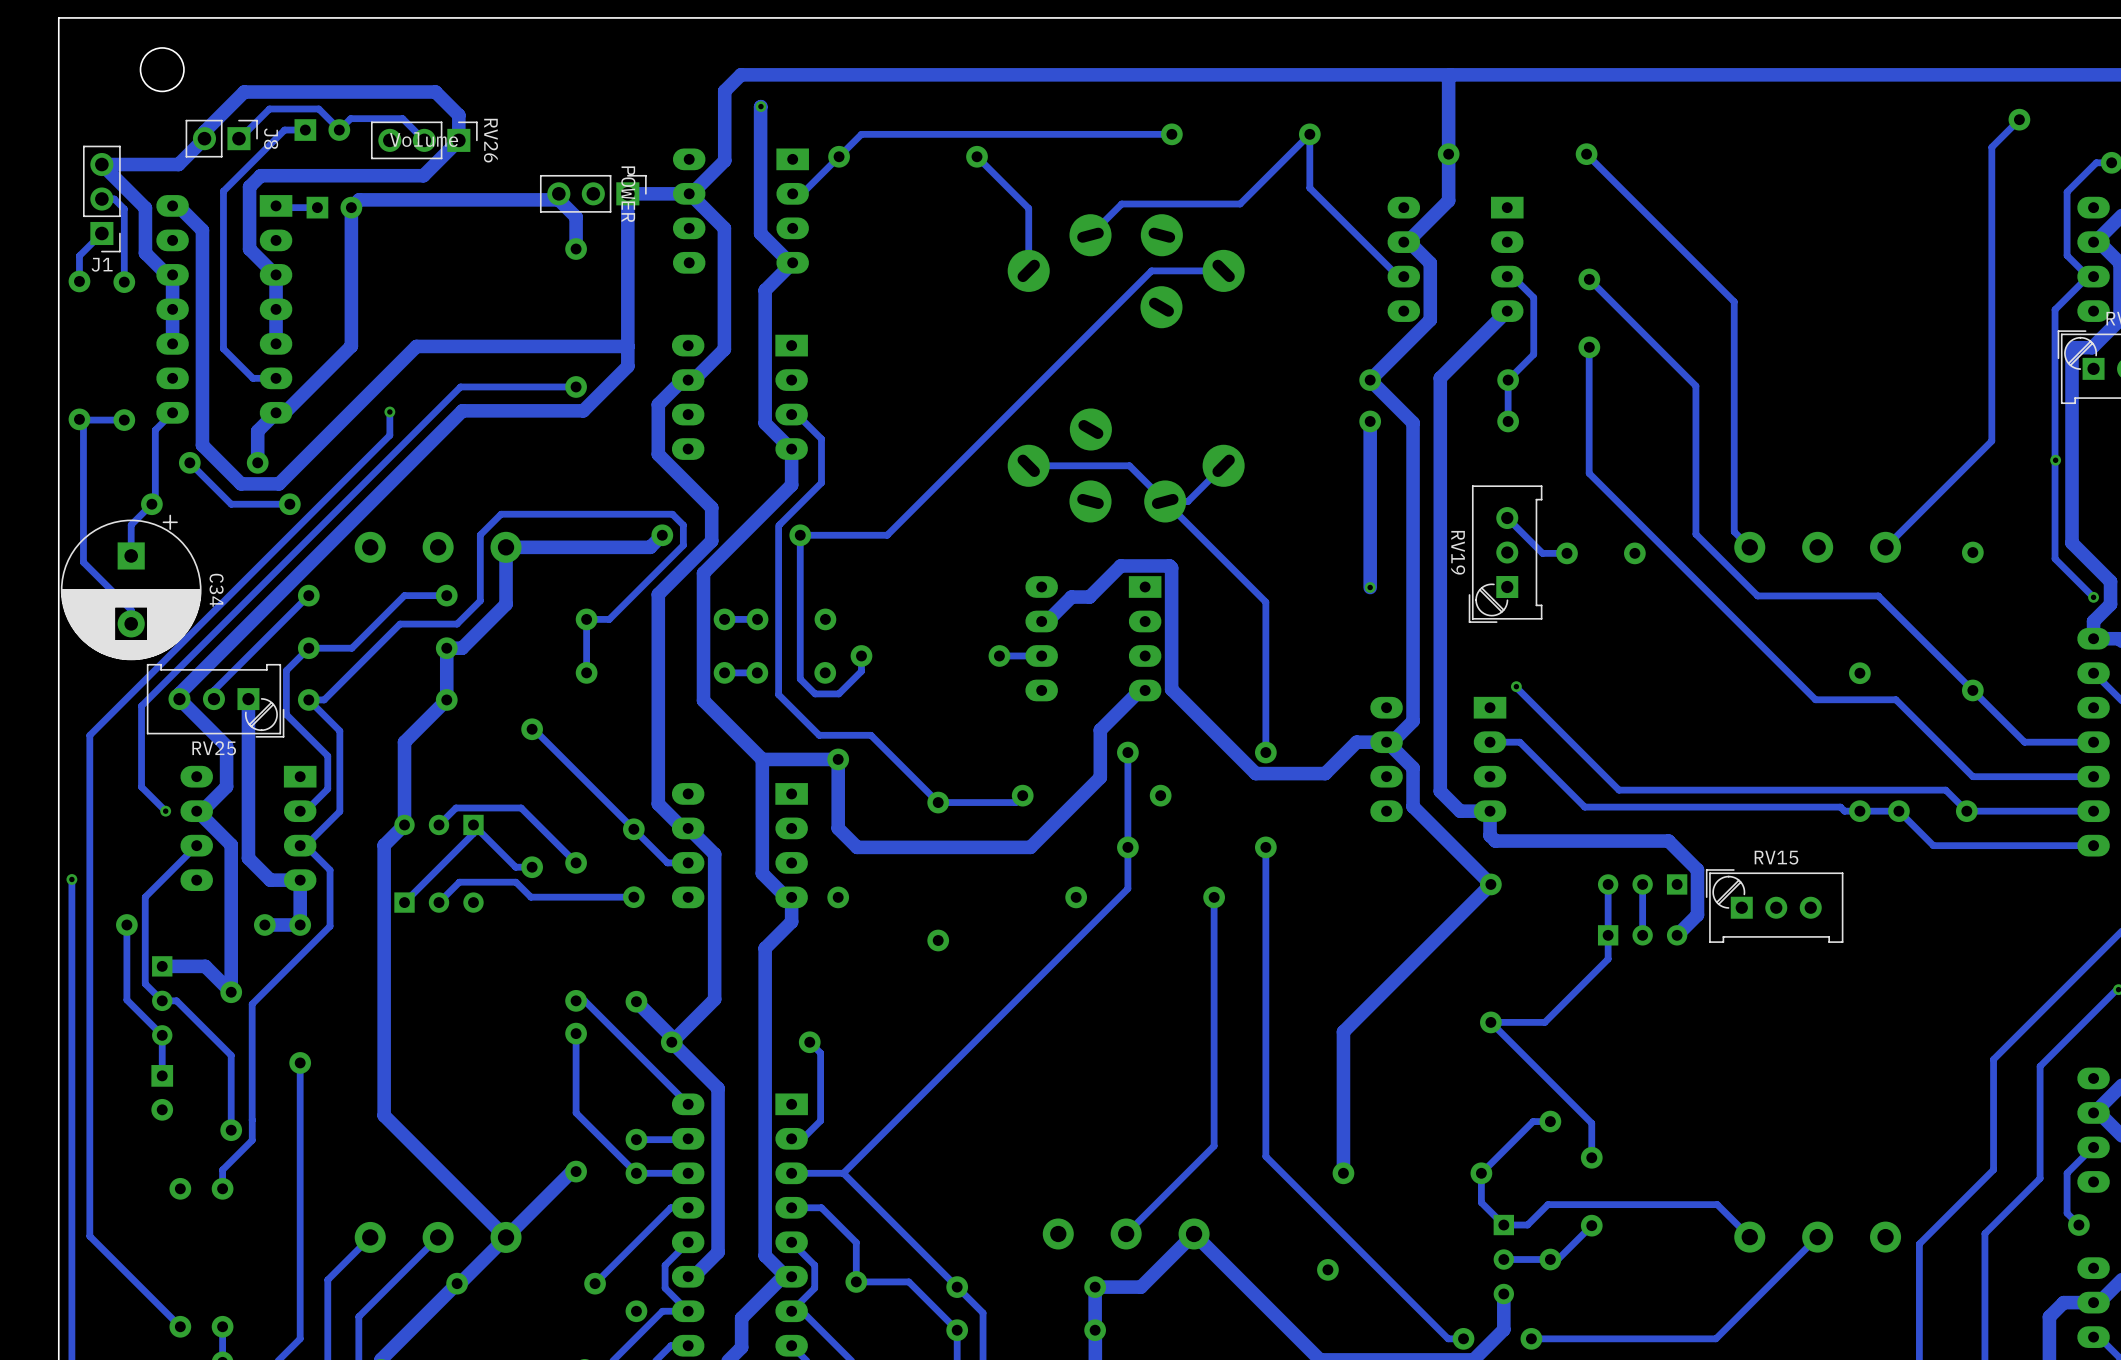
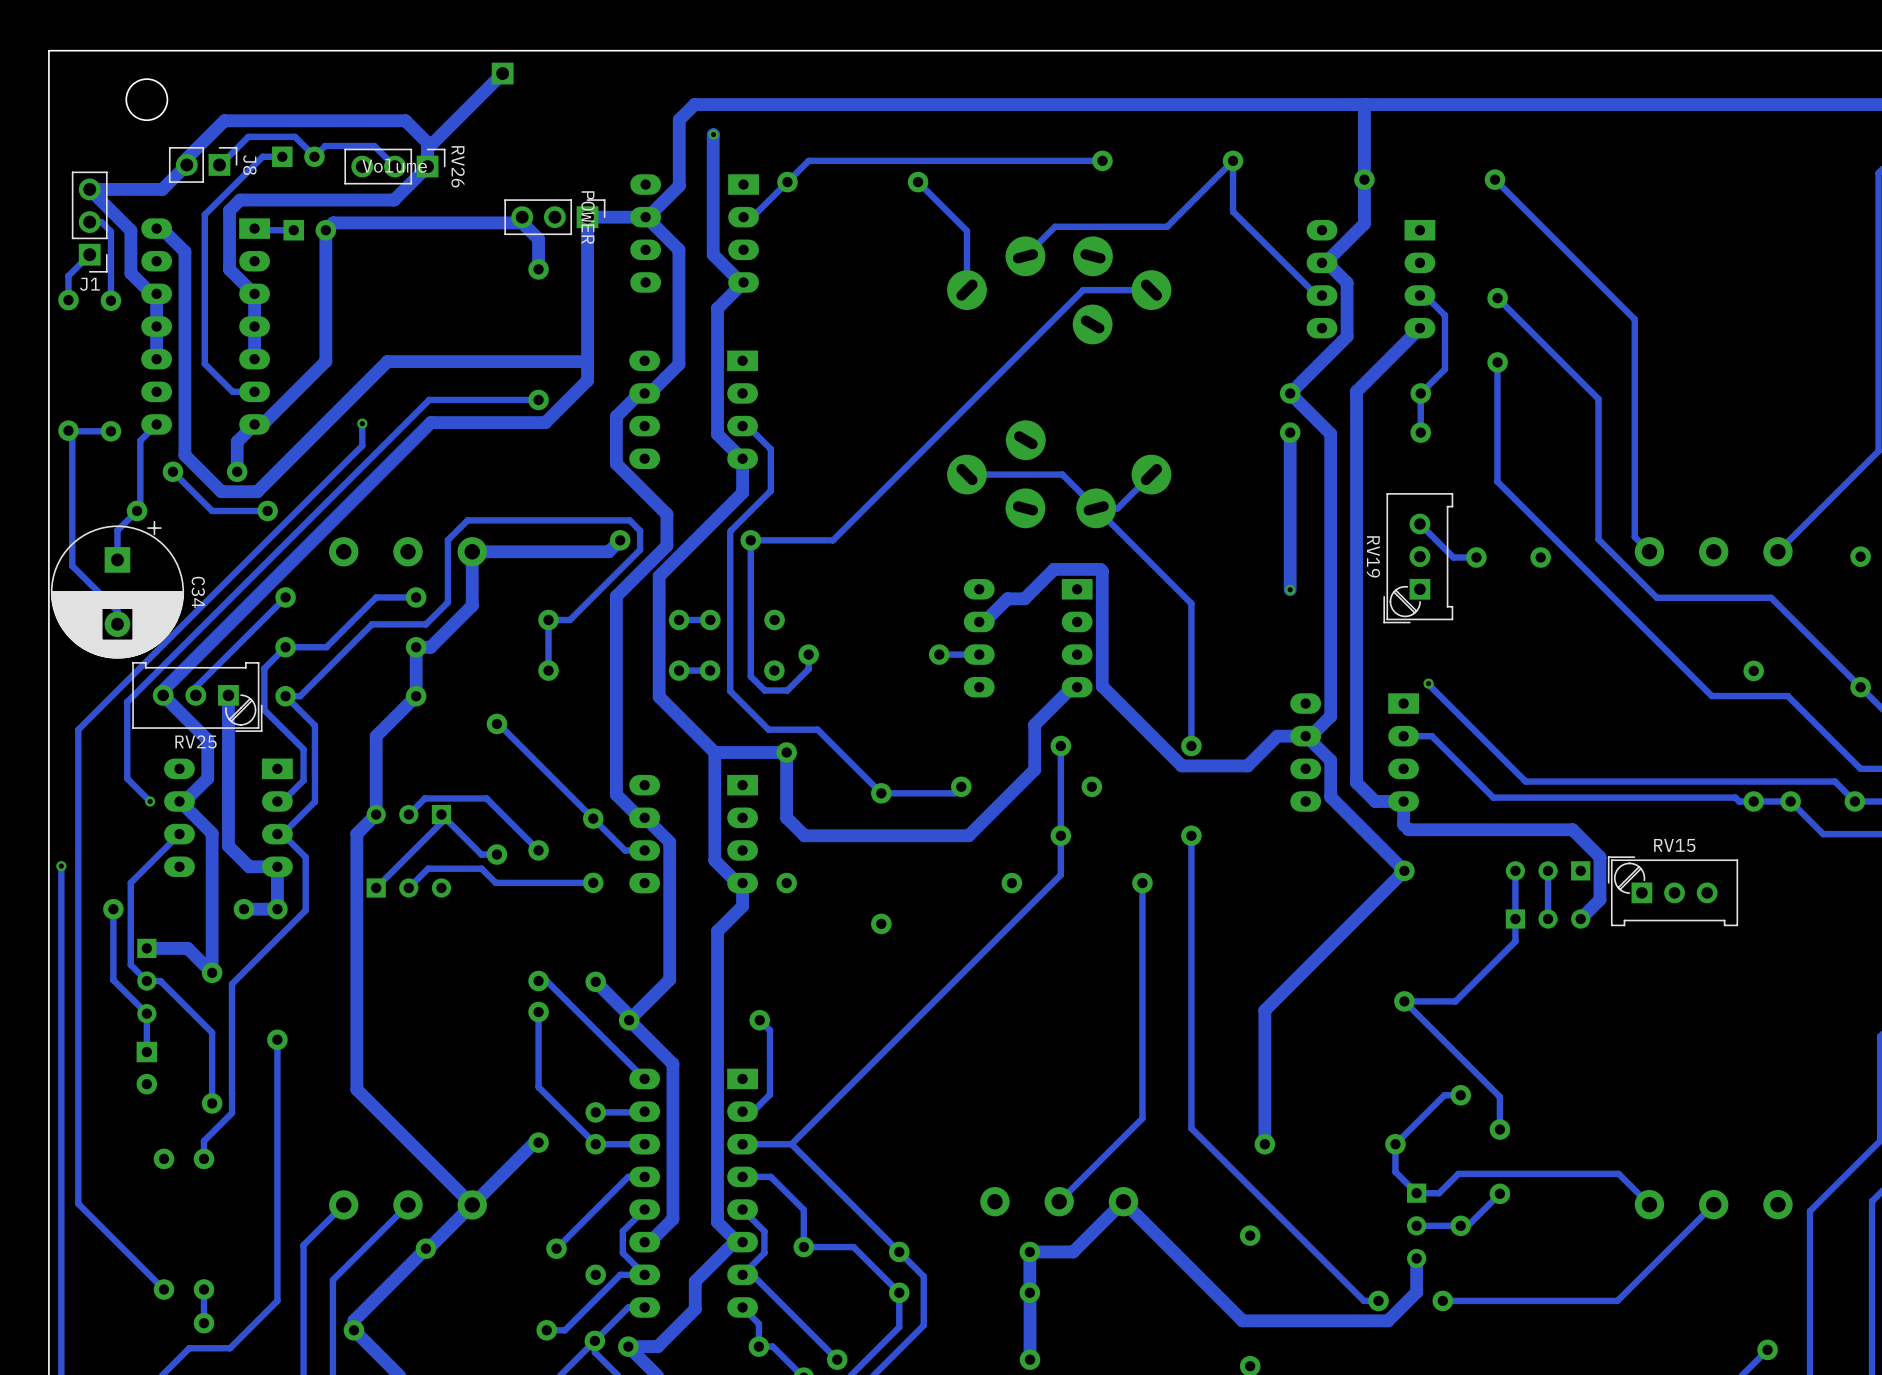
track: none -> (502, 73) (427, 148)
part: none -> (502, 73)

